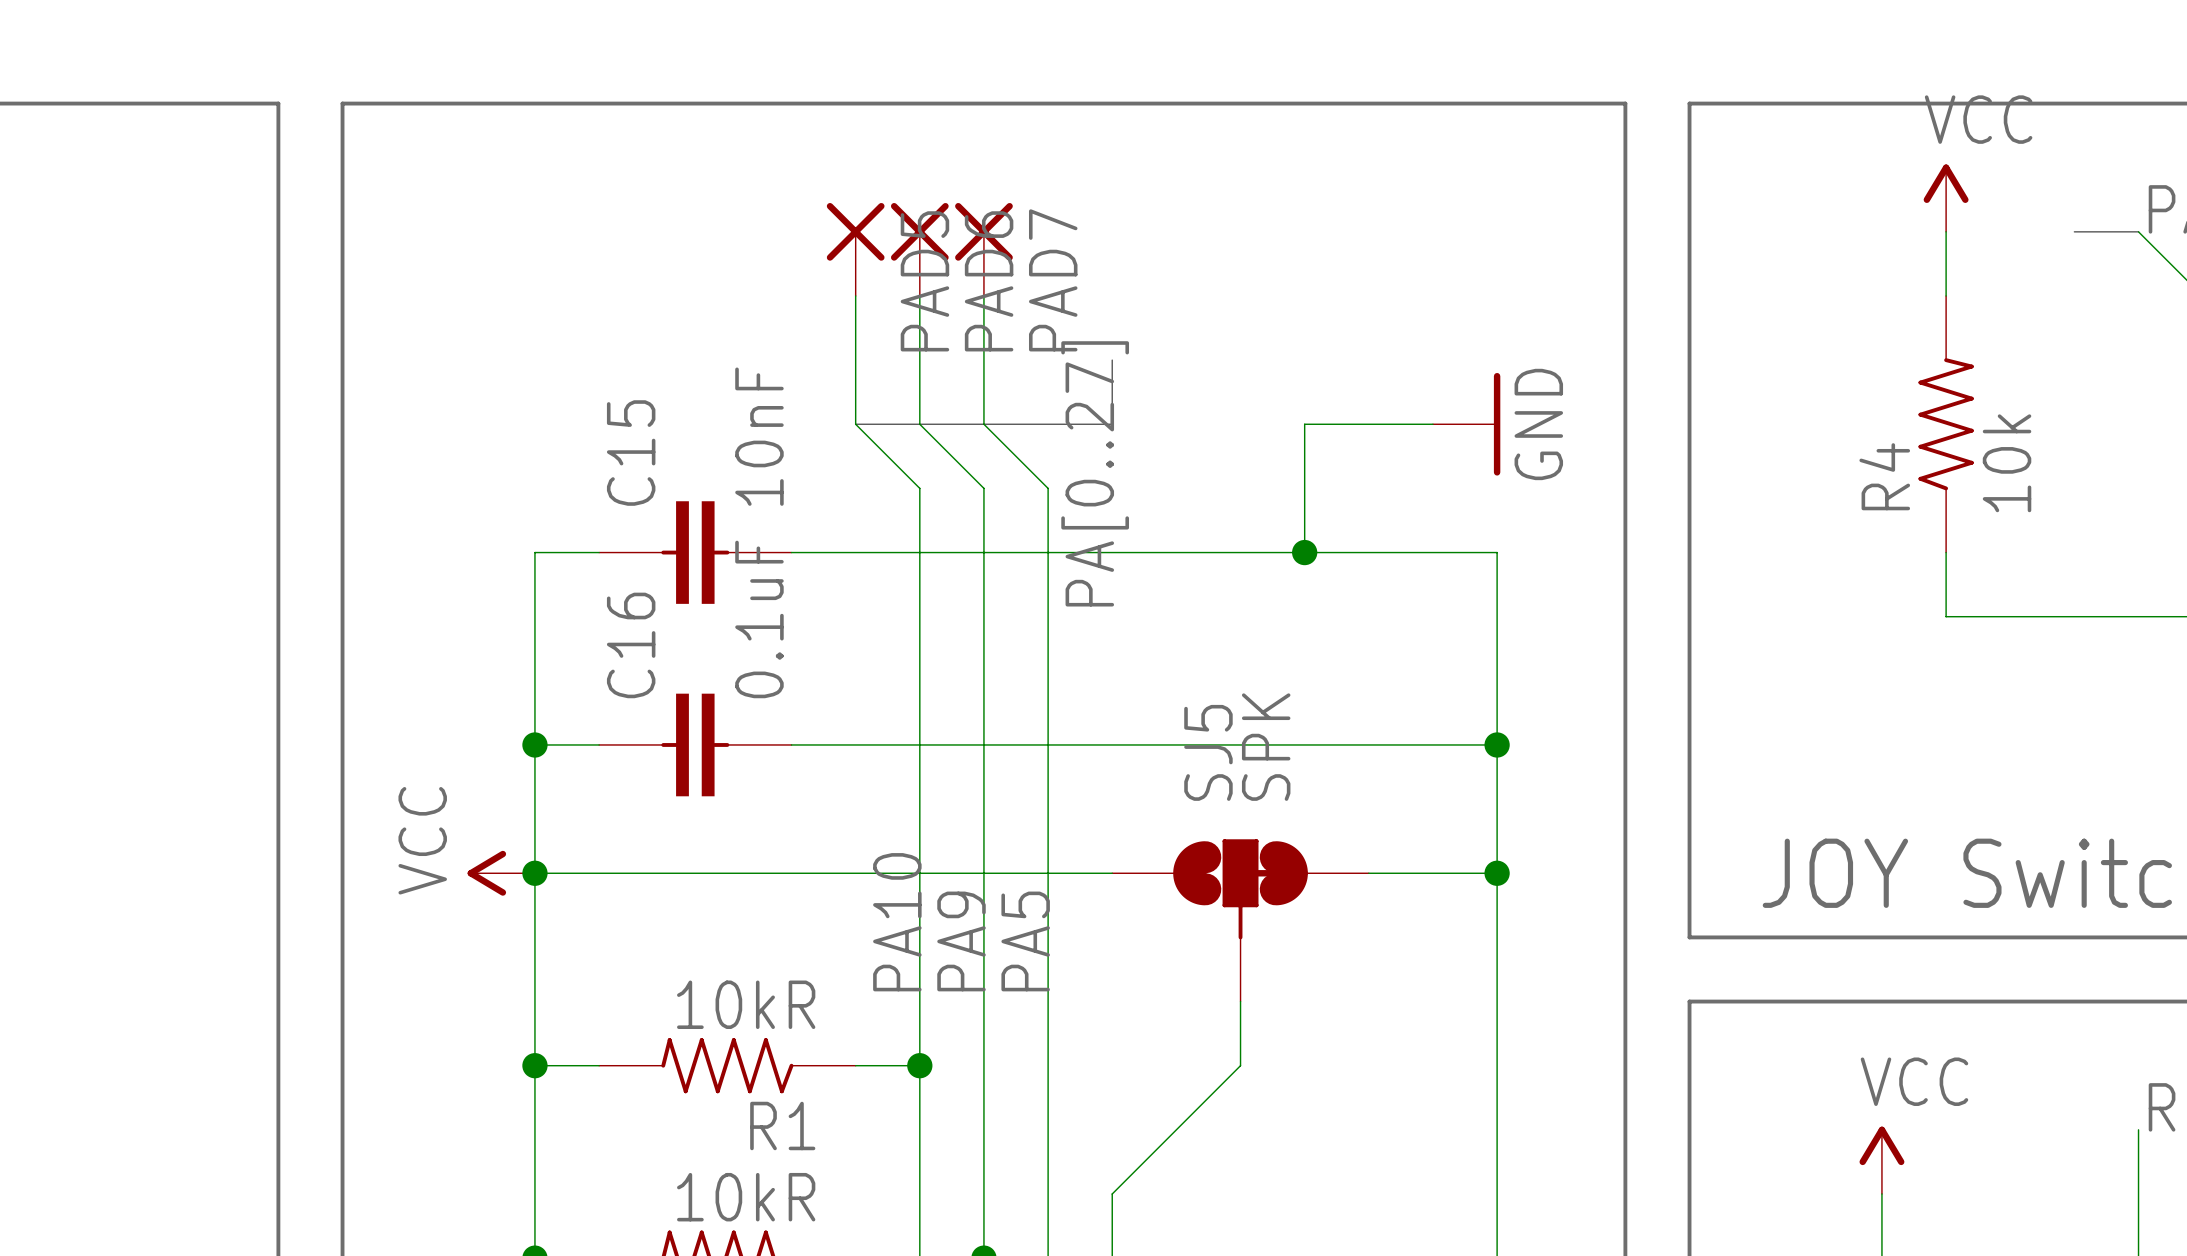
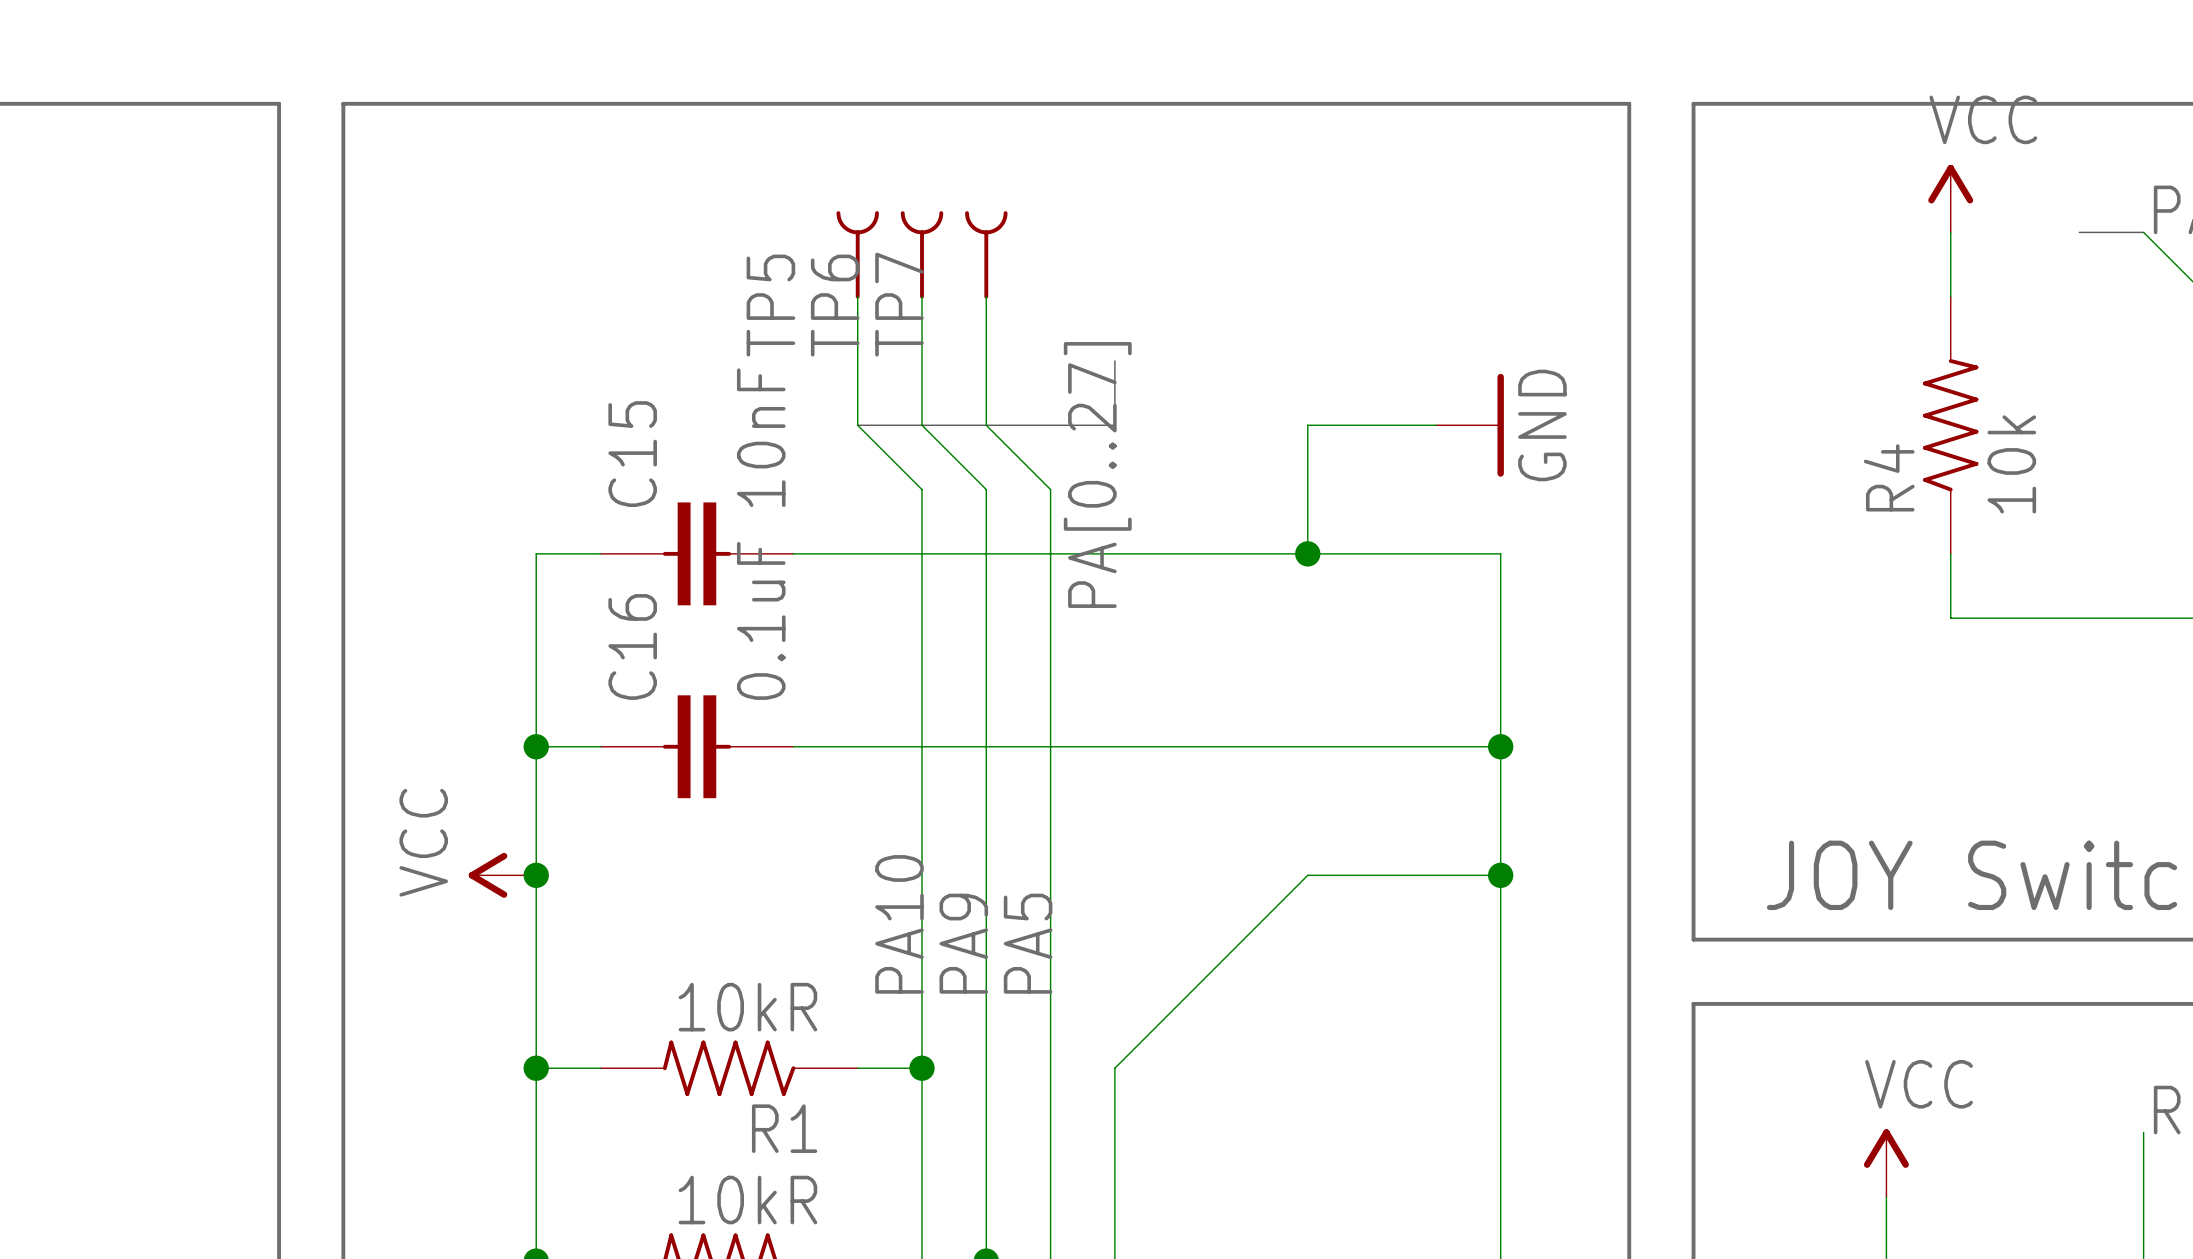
PAD5: (855, 249) -> none
PAD6: (919, 249) -> none
PAD7: (983, 249) -> none
TP5: none -> (857, 254)
TP6: none -> (922, 254)
TP7: none -> (986, 254)
wire: (534, 873) (1112, 873) -> none
SJ5: SPK (1240, 920) -> none
wire: (1240, 1001) (1240, 1065) (1112, 1193) -> (1372, 875) (1307, 875) (1114, 1068) (1114, 1196)

